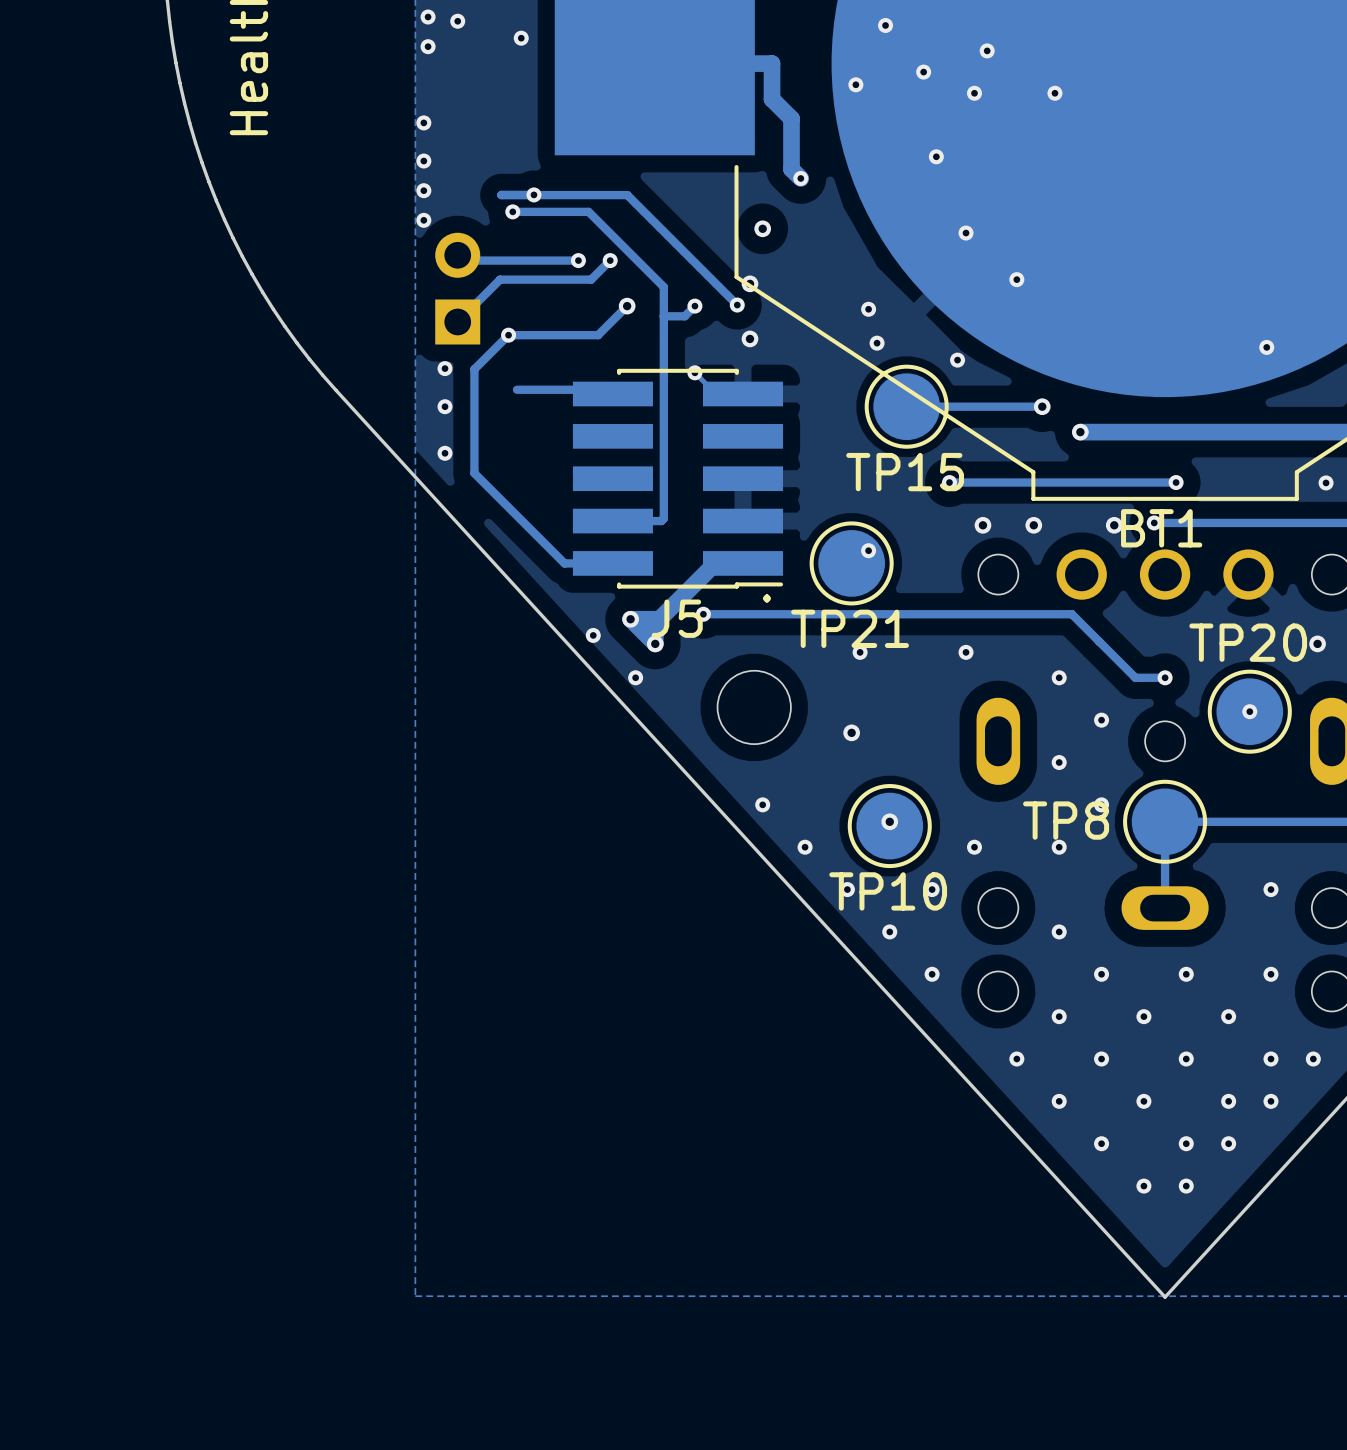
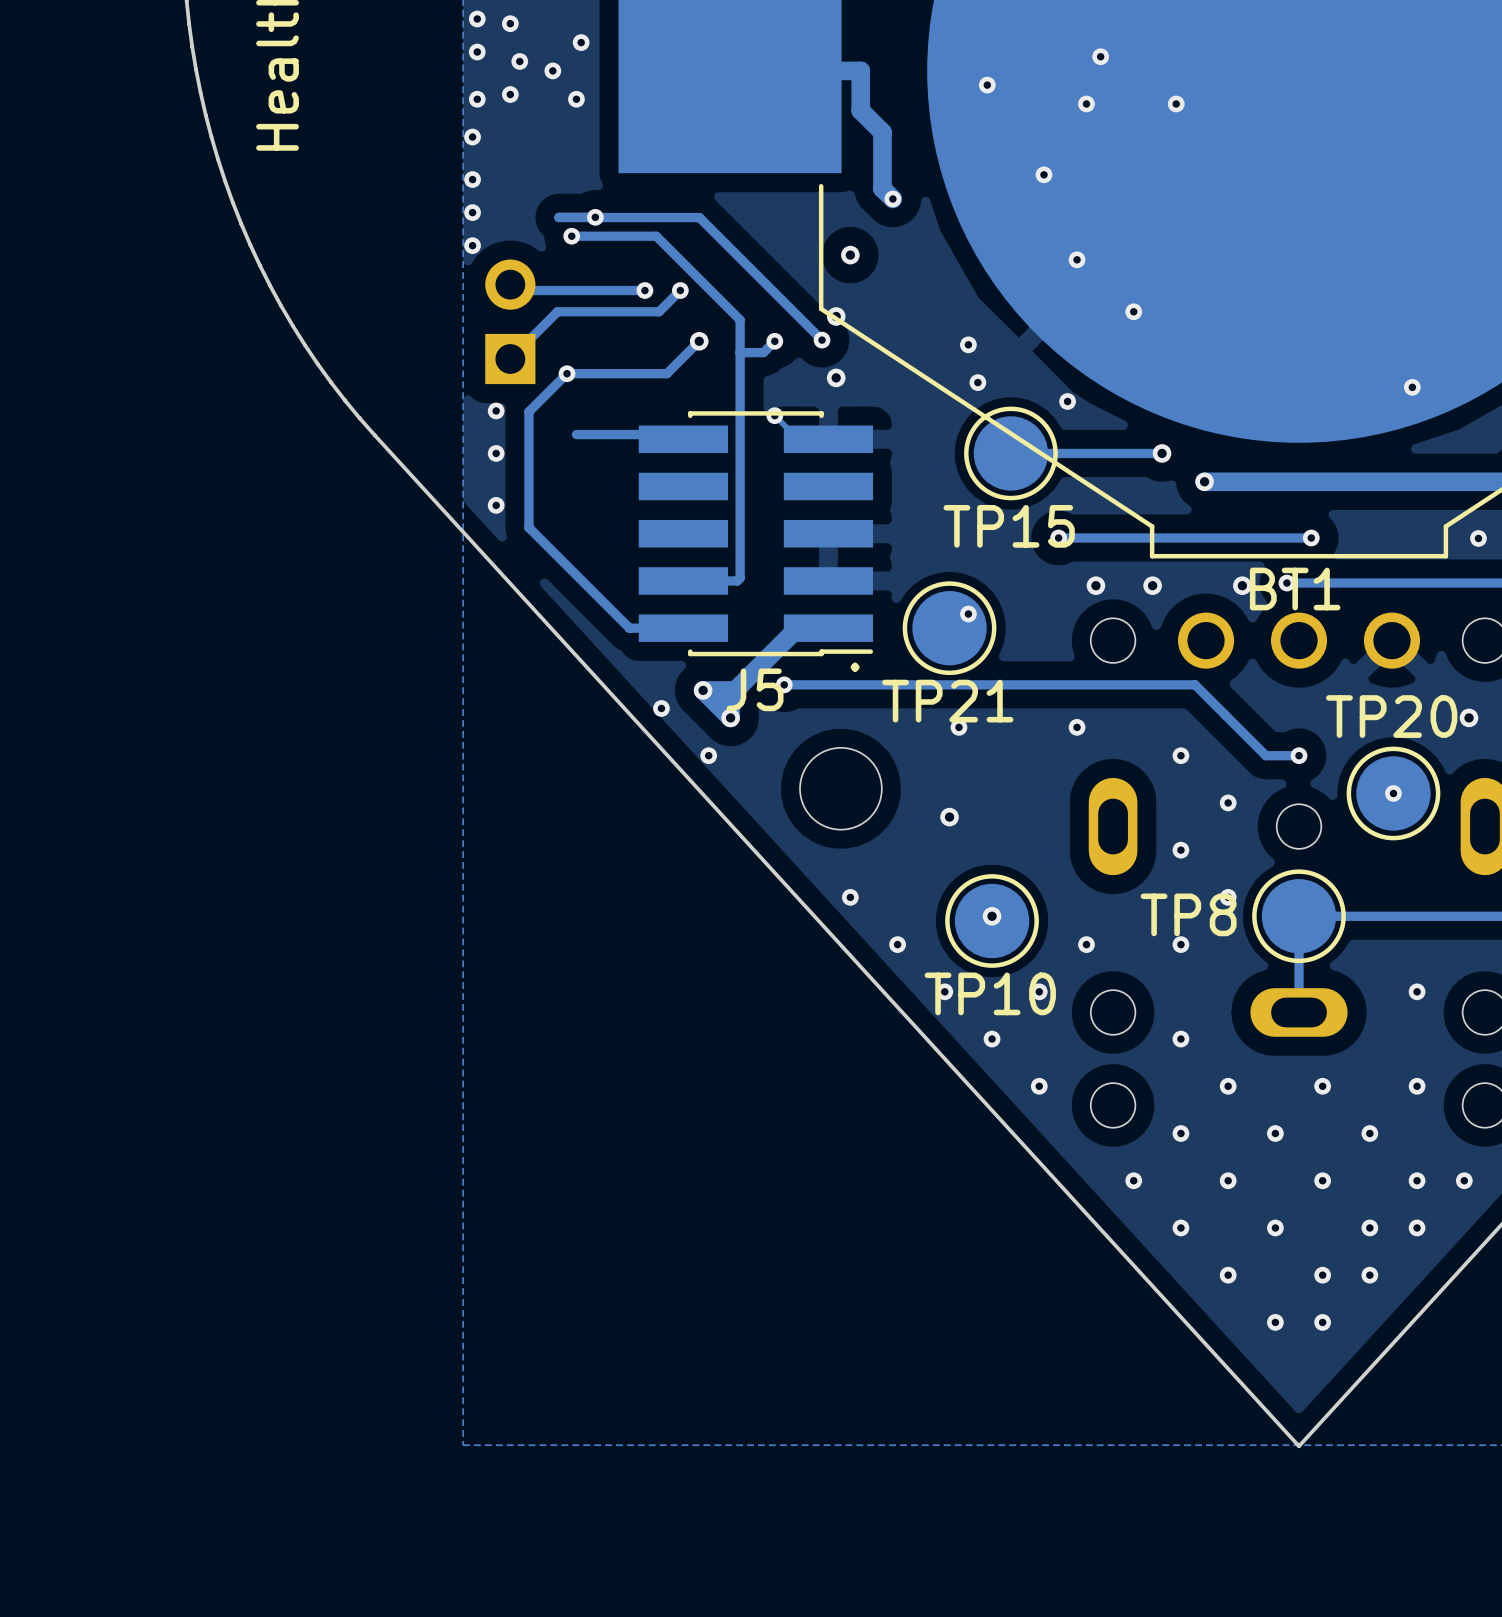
via: (885, 25) -> none
via: none -> (519, 61)
via: none -> (552, 70)
via: (923, 72) -> none
via: none -> (987, 85)
via: none -> (510, 94)
via: (855, 84) -> none
via: none -> (477, 99)
via: none -> (576, 99)

